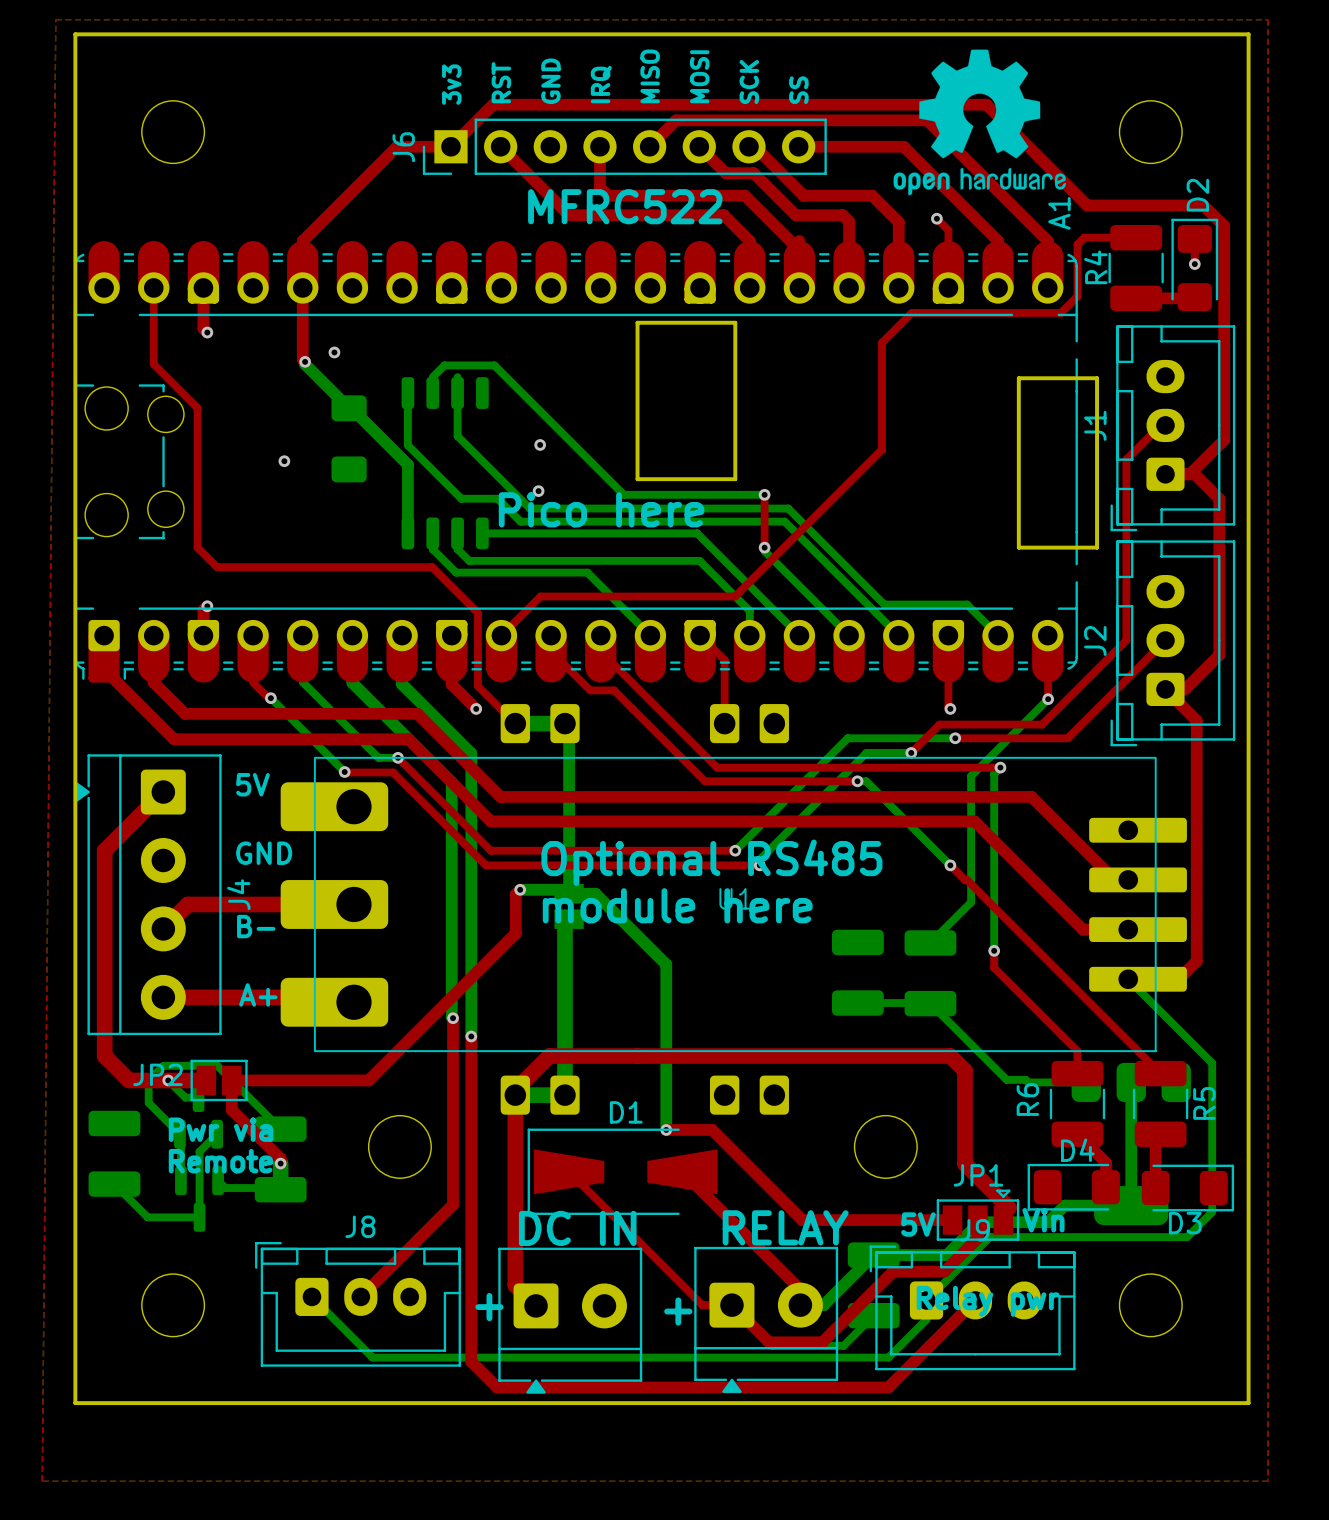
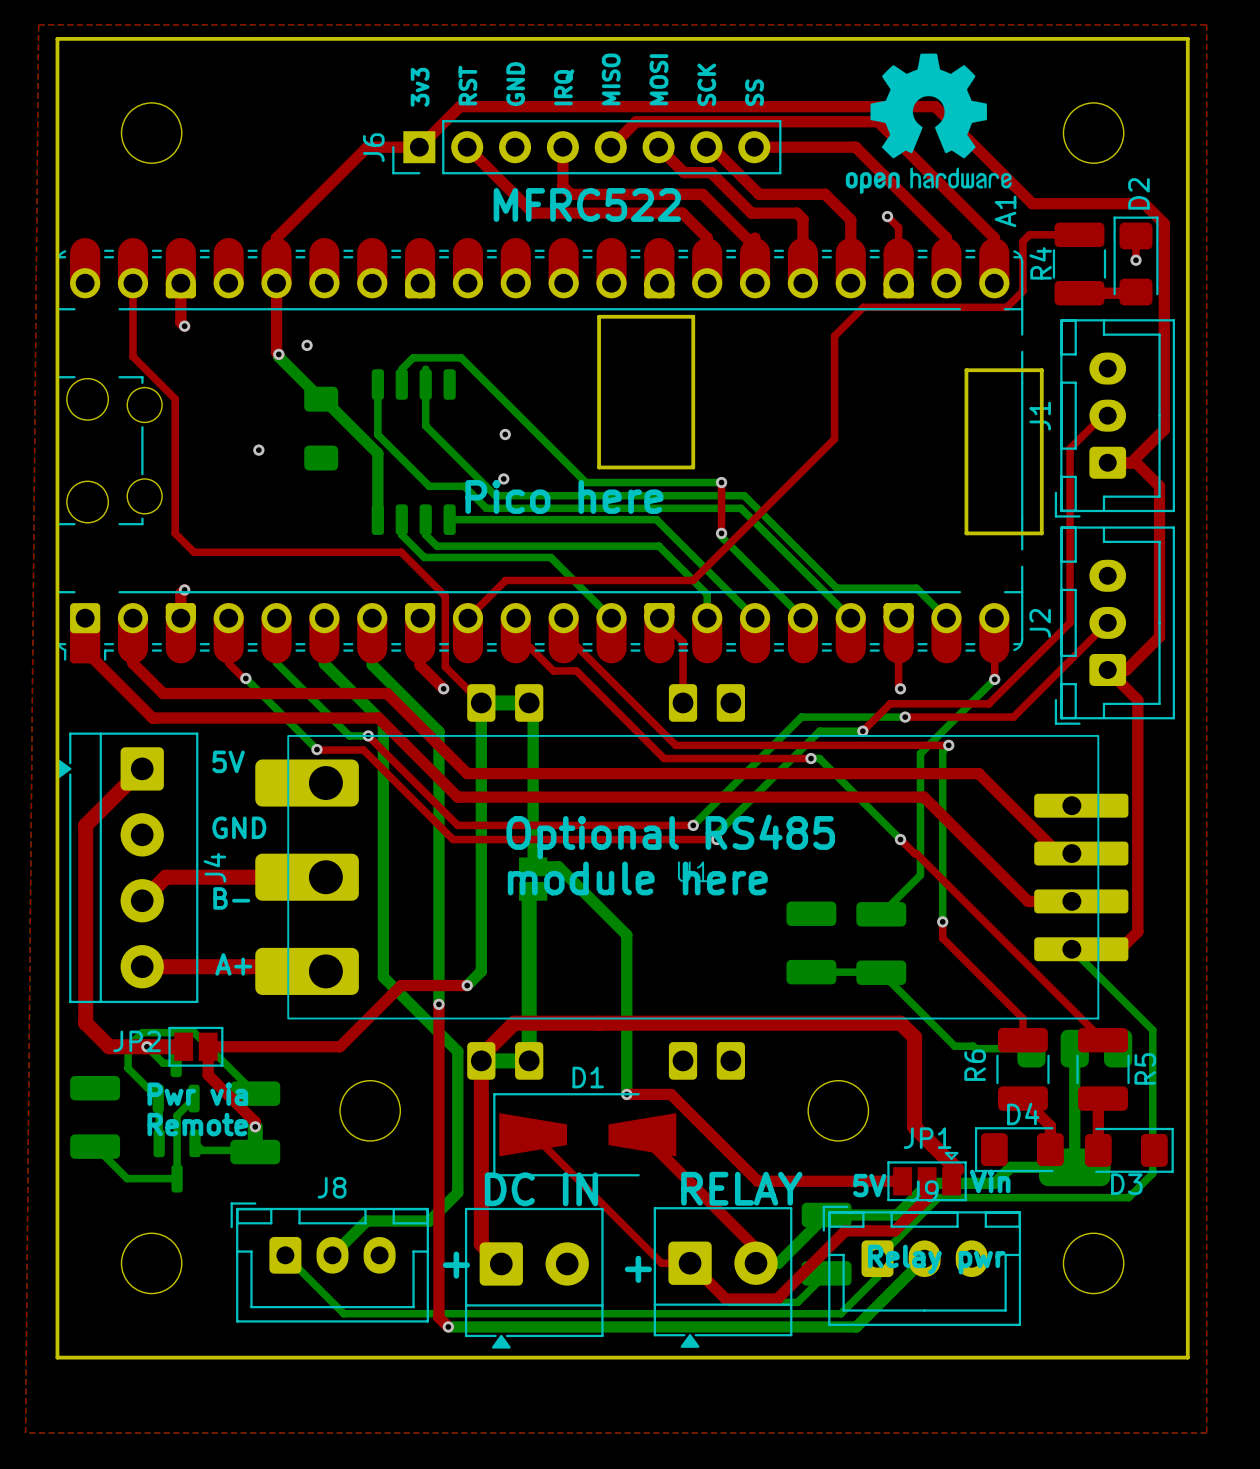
bottom track: none -> (481, 702) (481, 971) (467, 985)
bottom track: (413, 744) (451, 782) (453, 1018) -> (383, 722) (383, 977) (457, 1051) (457, 1192) (429, 1221) (366, 1221) (332, 1255)
top track: (520, 889) (515, 894) (515, 933) (432, 1016) -> (467, 985) (401, 985)
bottom track: (520, 889) (565, 889) (569, 893) -> none
via: (520, 889) -> none
top track: (453, 1018) (453, 1204) (360, 1296) -> none
via position: (453, 1018) -> (467, 985)
top track: (975, 1300) (888, 1387) (497, 1387) (481, 1371) -> none
bottom track: none -> (924, 1258) (856, 1326) (448, 1326)
via: none -> (448, 1326)

